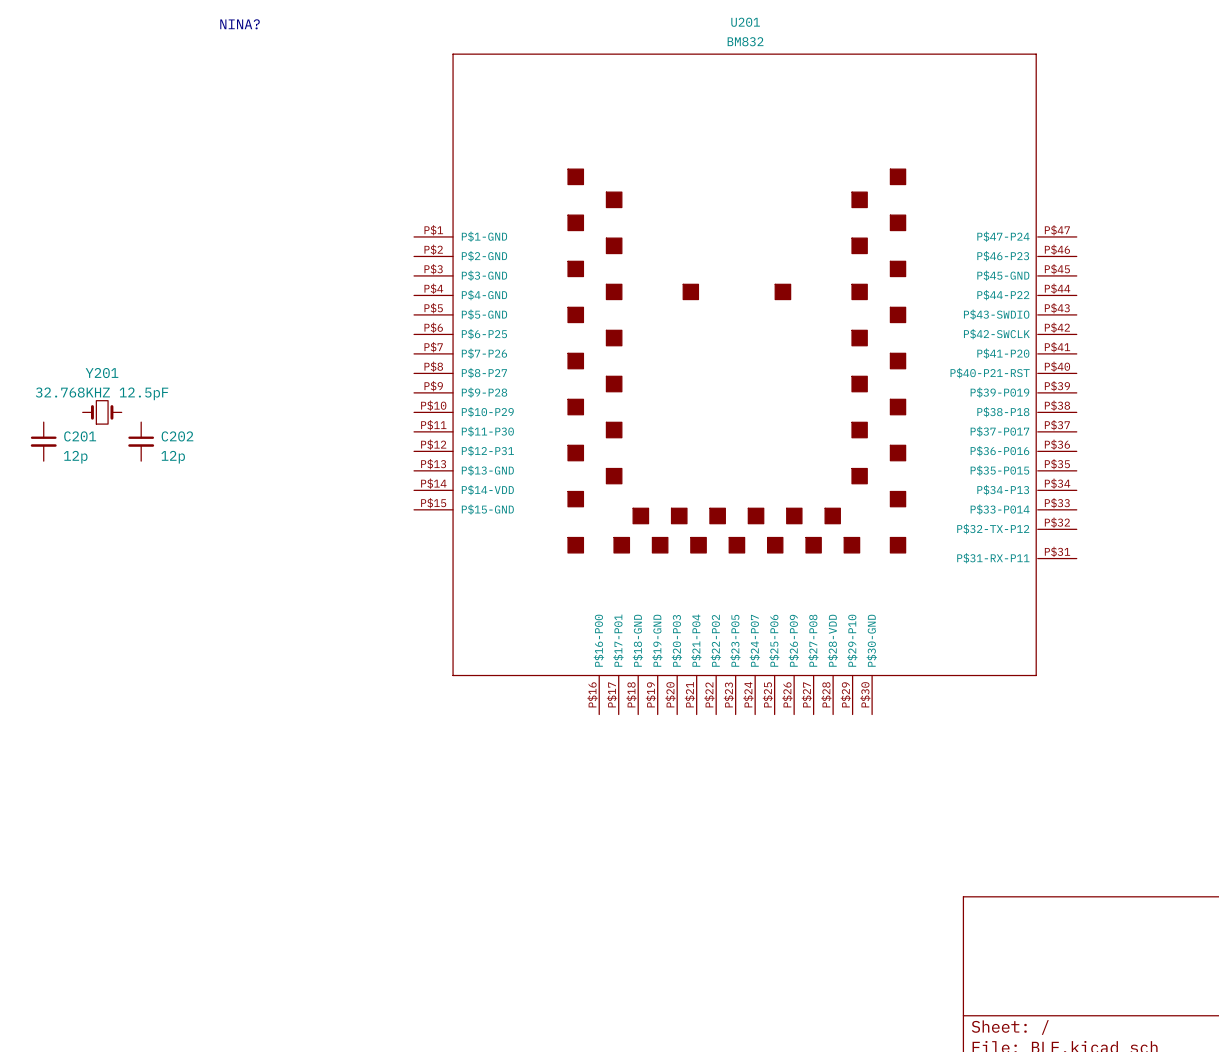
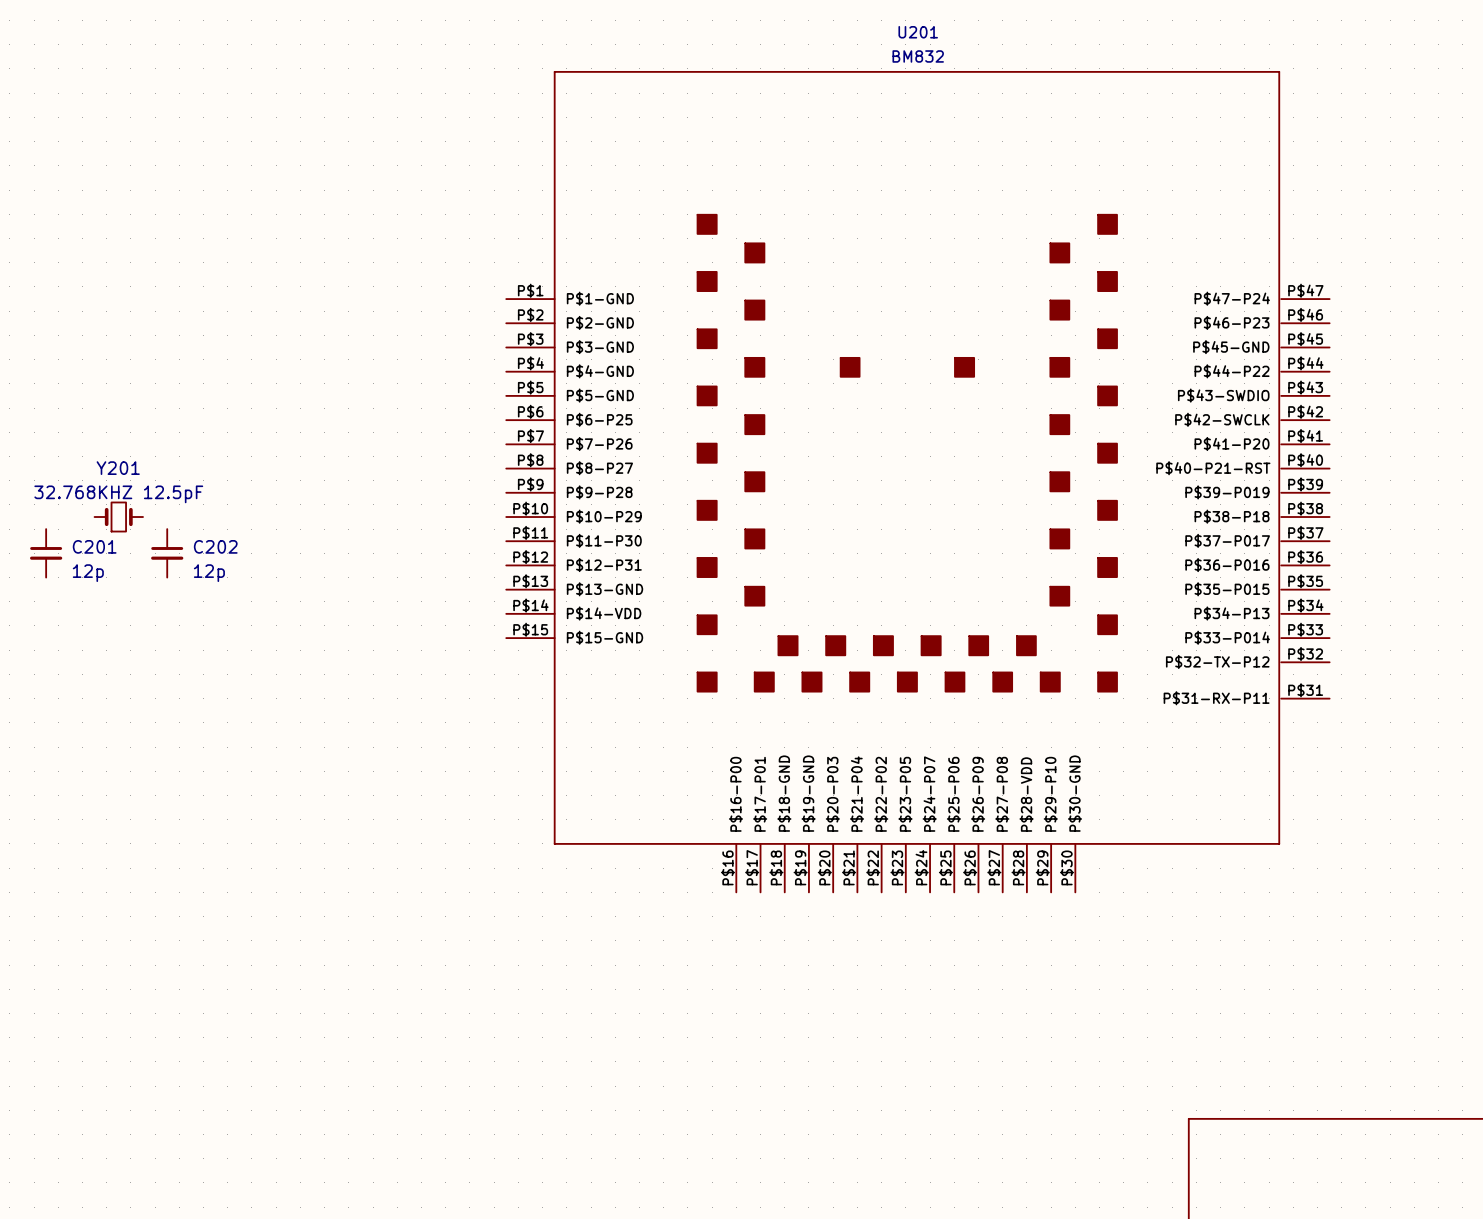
text: NINA? (240, 24) -> none

